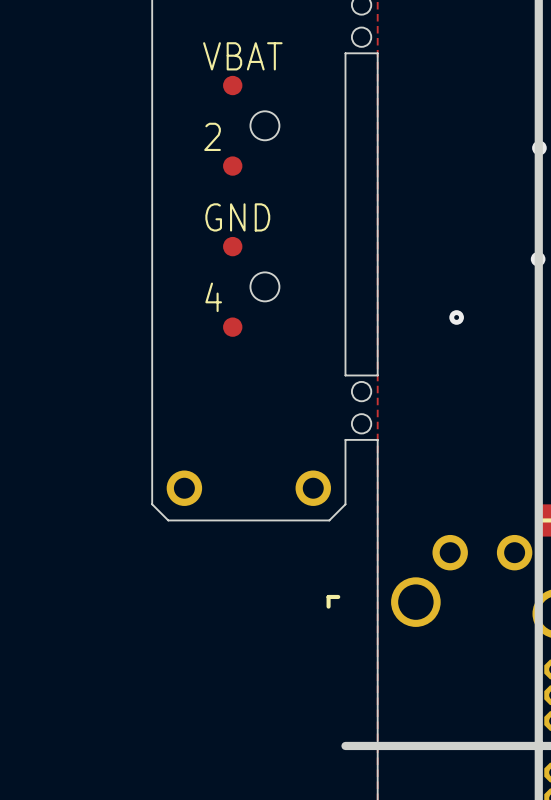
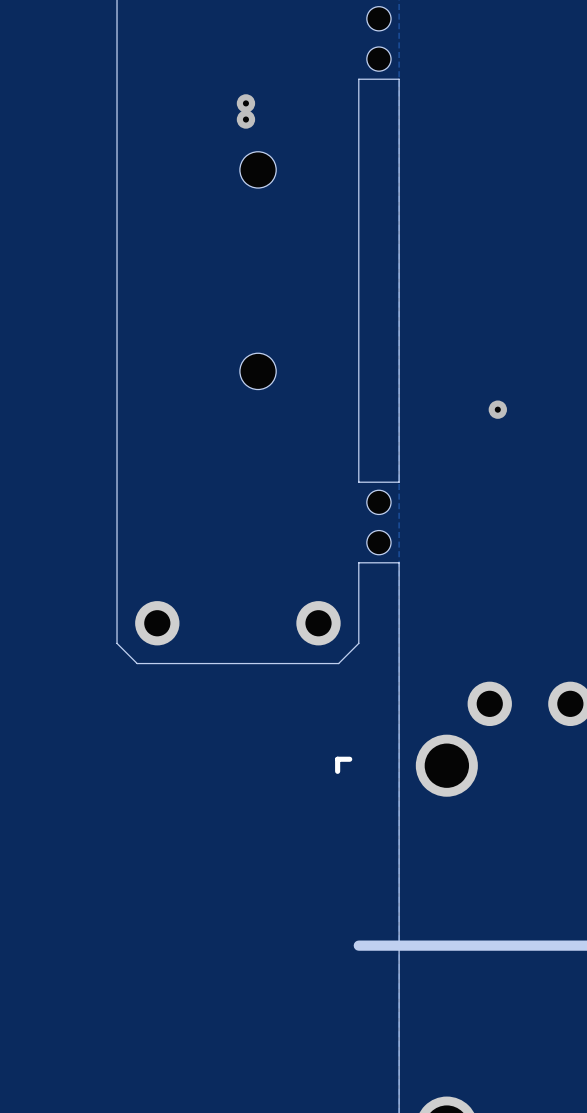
via: none -> (245, 103)
part: VBAT (232, 85) -> none
via: none -> (245, 119)
part: 2 (232, 166) -> none
part: GND (232, 246) -> none
part: 4 (232, 327) -> none

